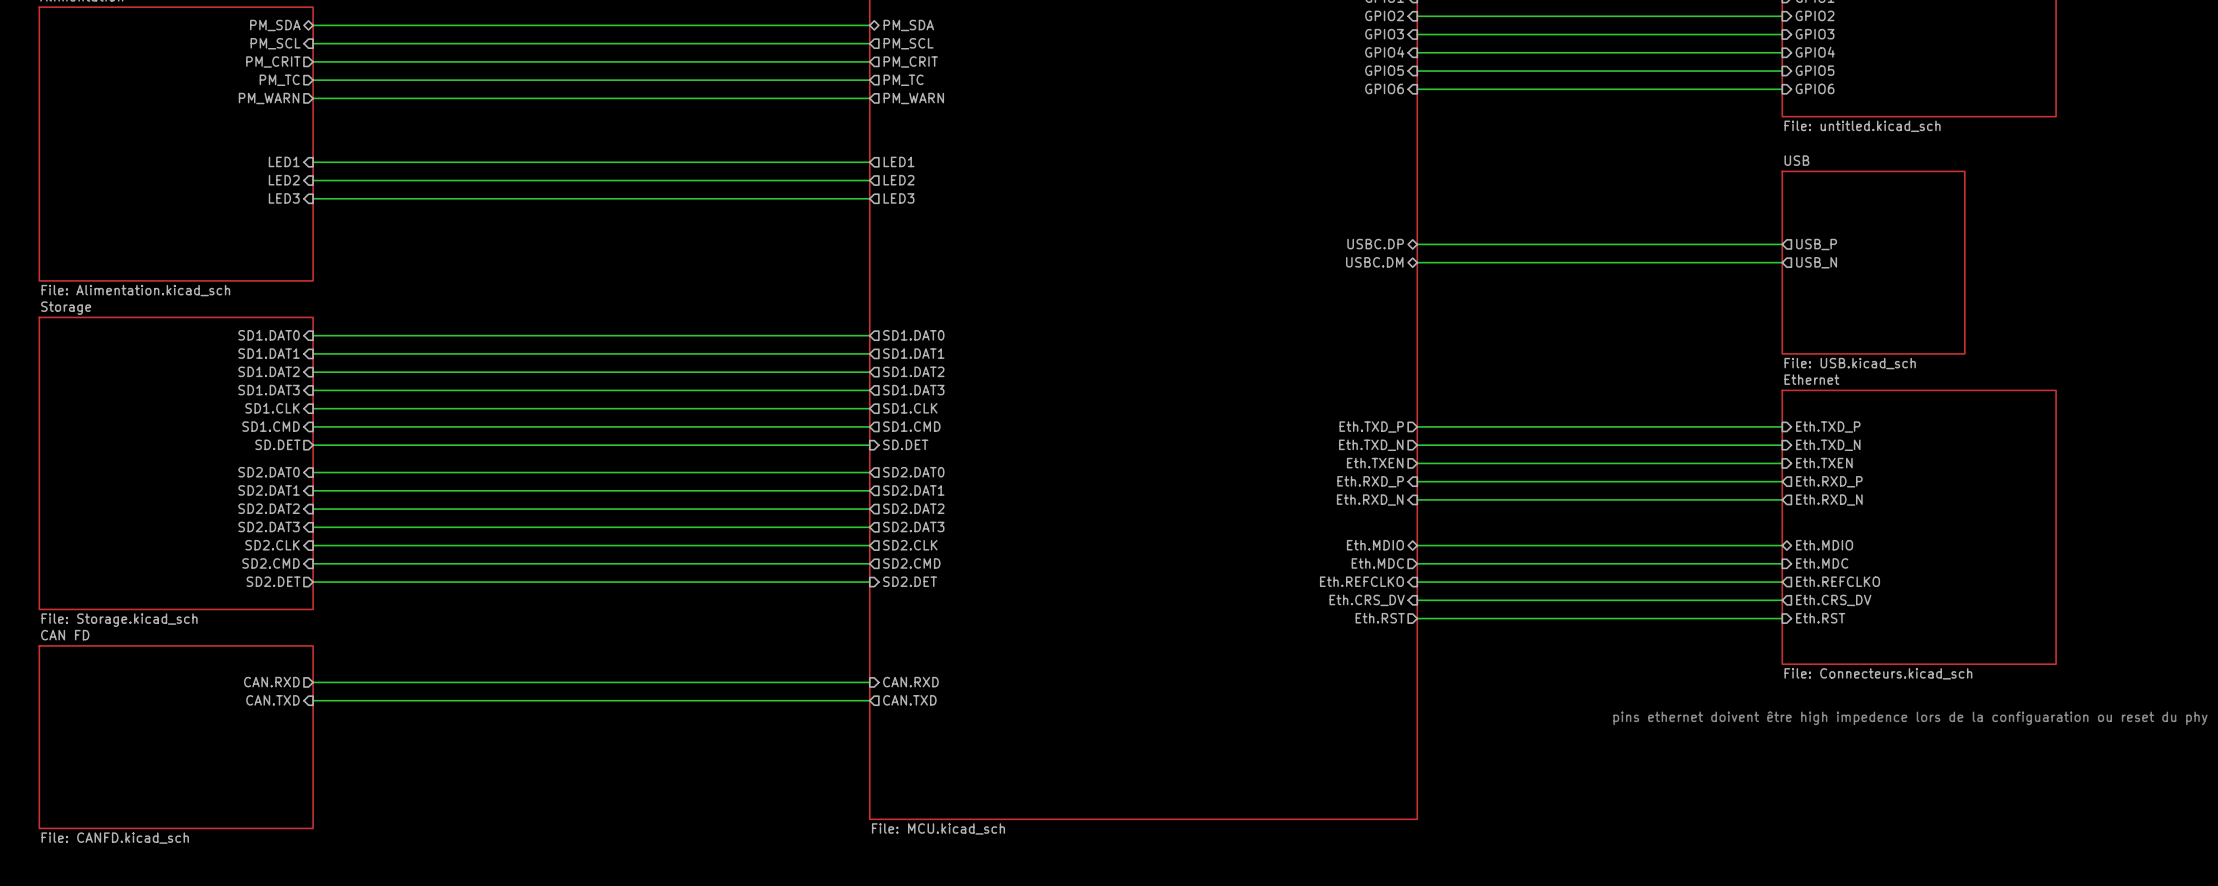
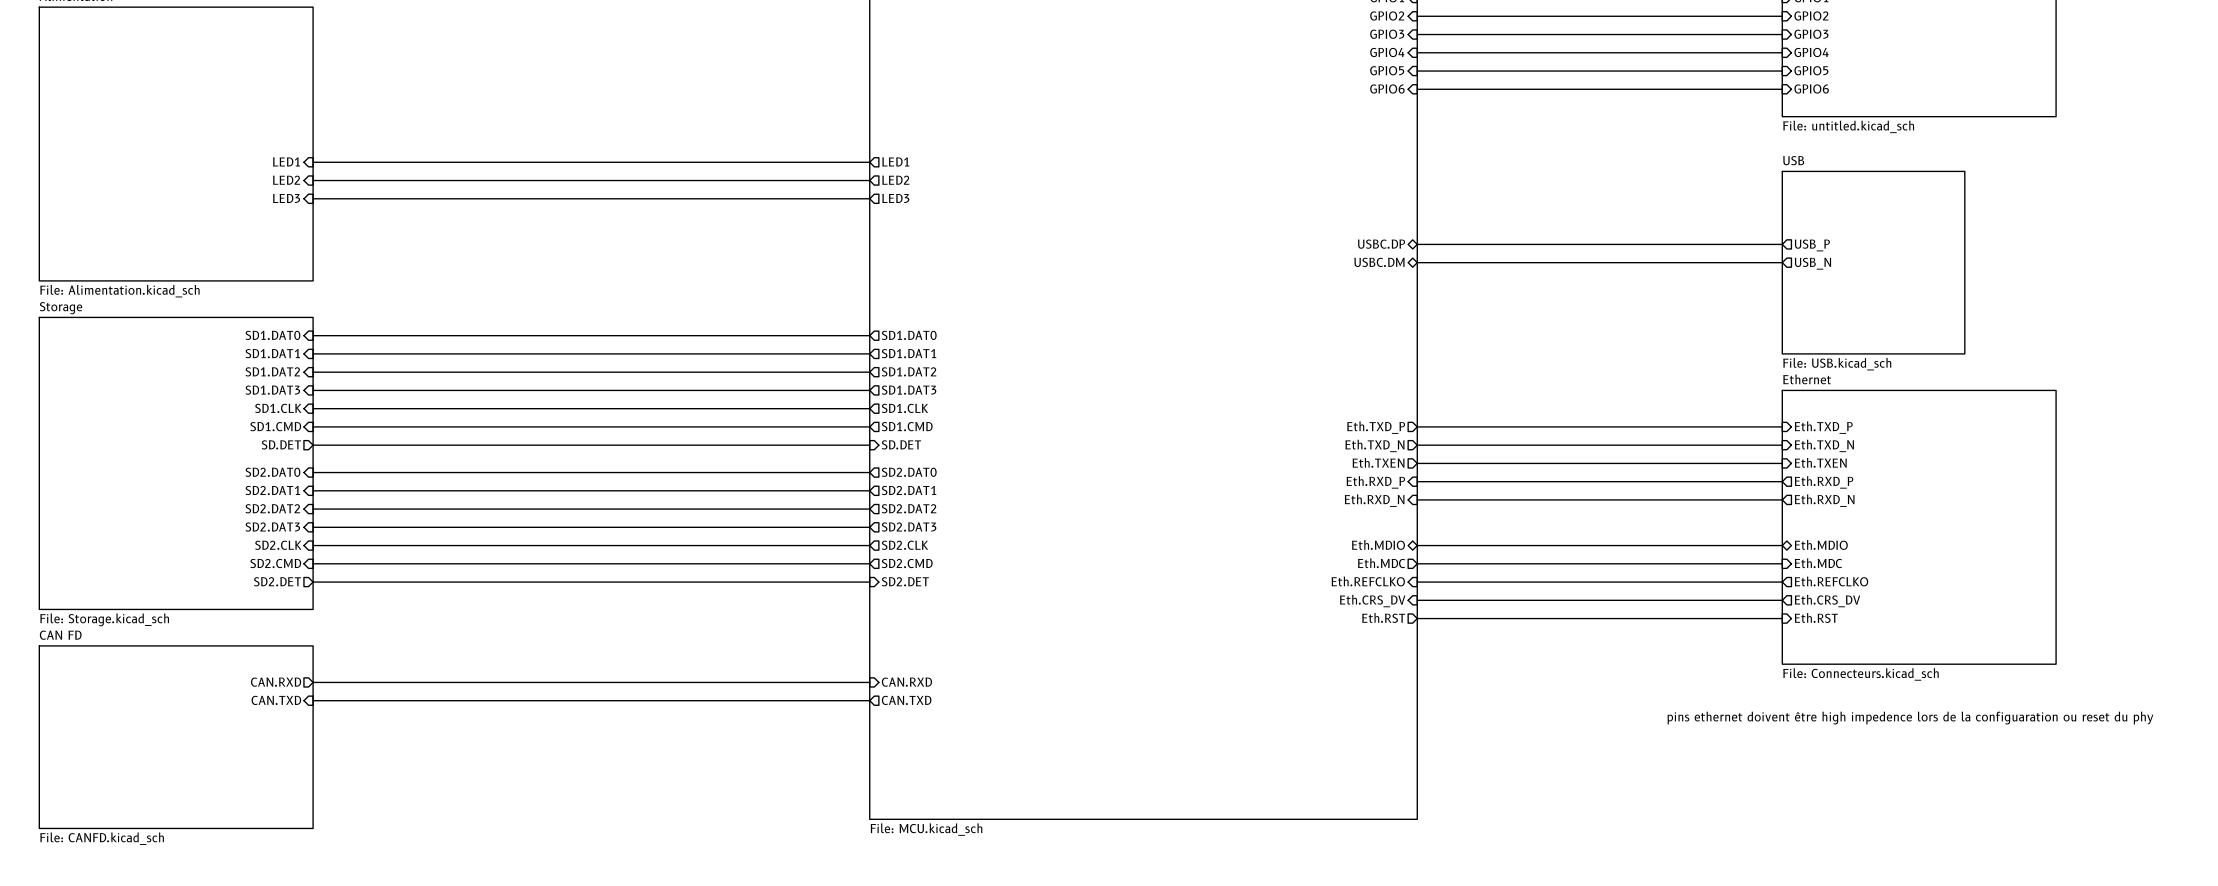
sheet pin: PM_SDA (275, 25) -> none
wire: (313, 25) (869, 25) -> none
sheet pin: PM_SDA (908, 25) -> none
sheet pin: PM_SCL (275, 43) -> none
wire: (313, 43) (869, 43) -> none
sheet pin: PM_SCL (908, 43) -> none
sheet pin: PM_CRIT (273, 61) -> none
wire: (313, 61) (869, 61) -> none
sheet pin: PM_CRIT (910, 61) -> none
sheet pin: PM_TC (279, 80) -> none
wire: (313, 80) (869, 80) -> none
sheet pin: PM_TC (903, 80) -> none
sheet pin: PM_WARN (269, 98) -> none
wire: (313, 98) (869, 98) -> none
sheet pin: PM_WARN (913, 98) -> none

